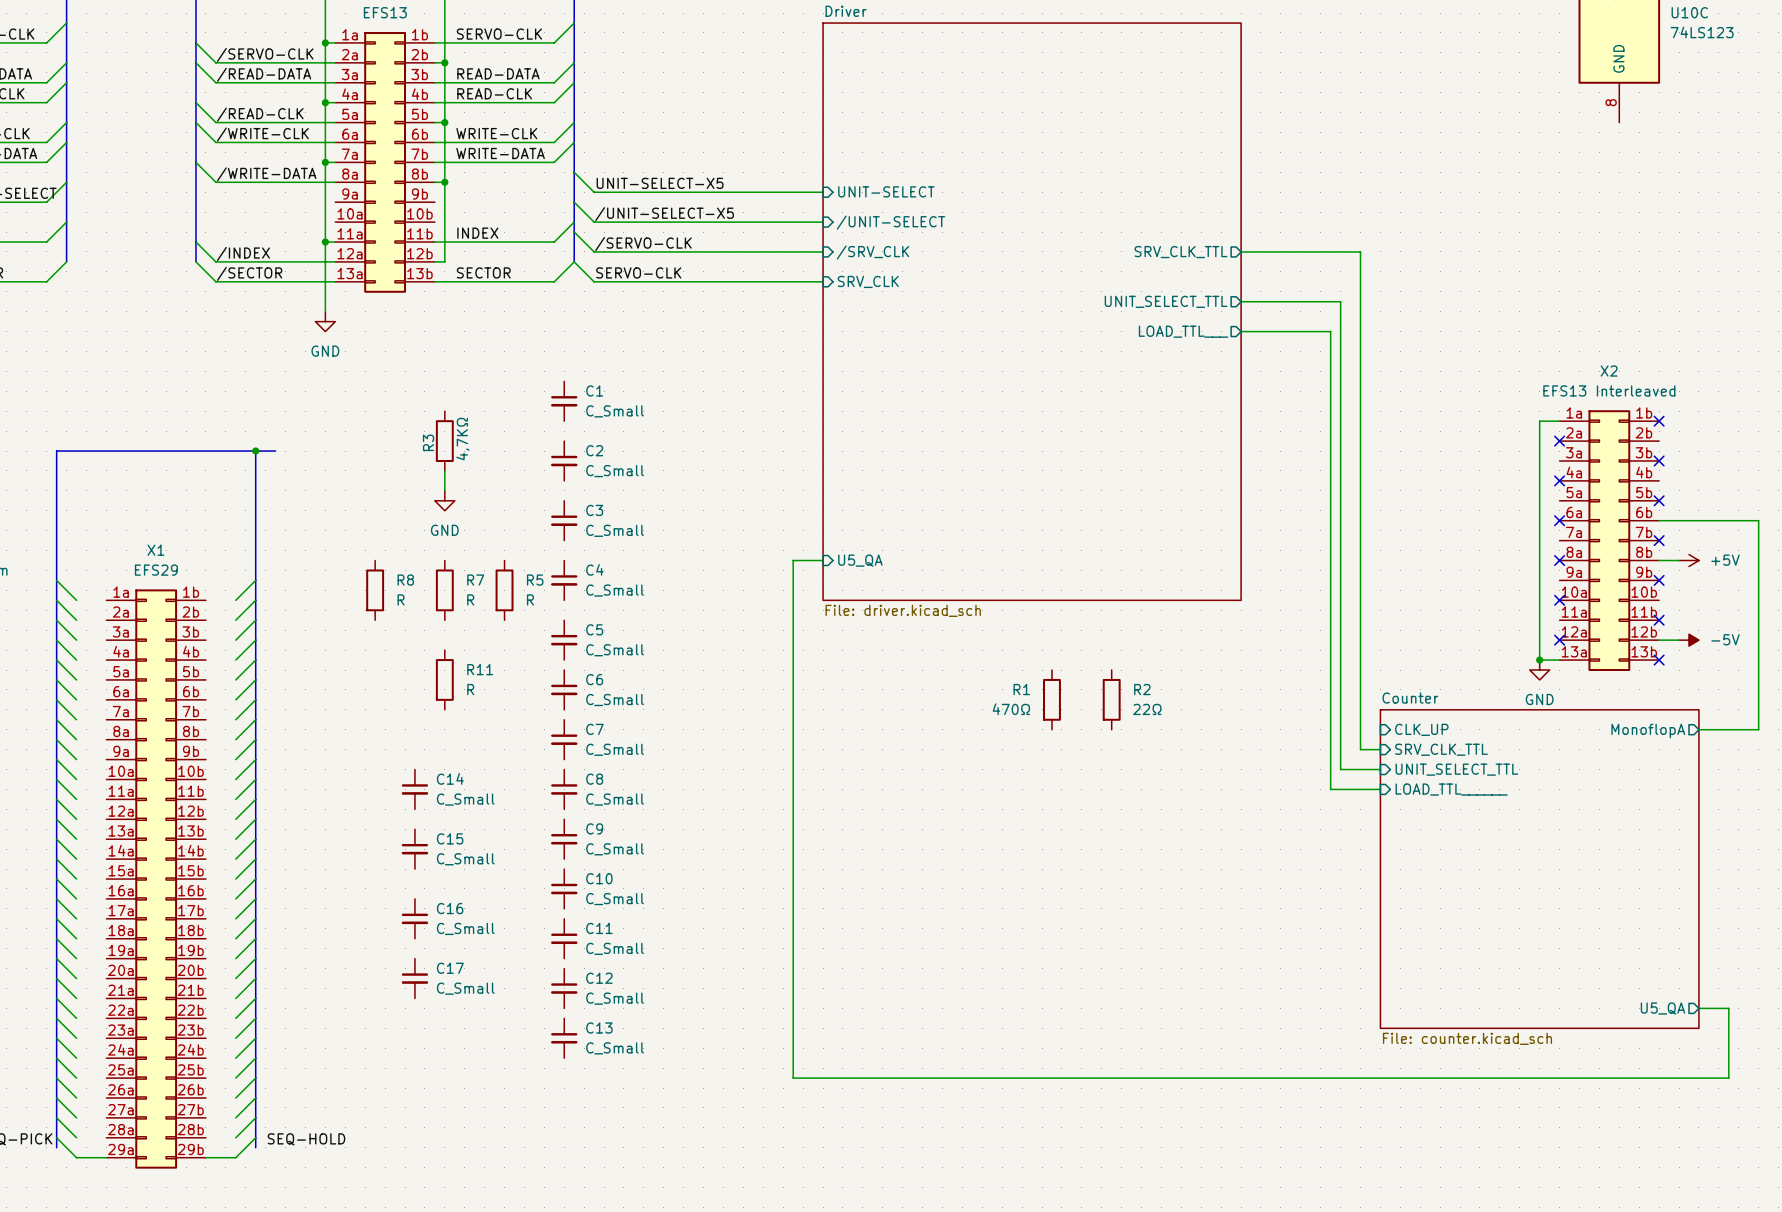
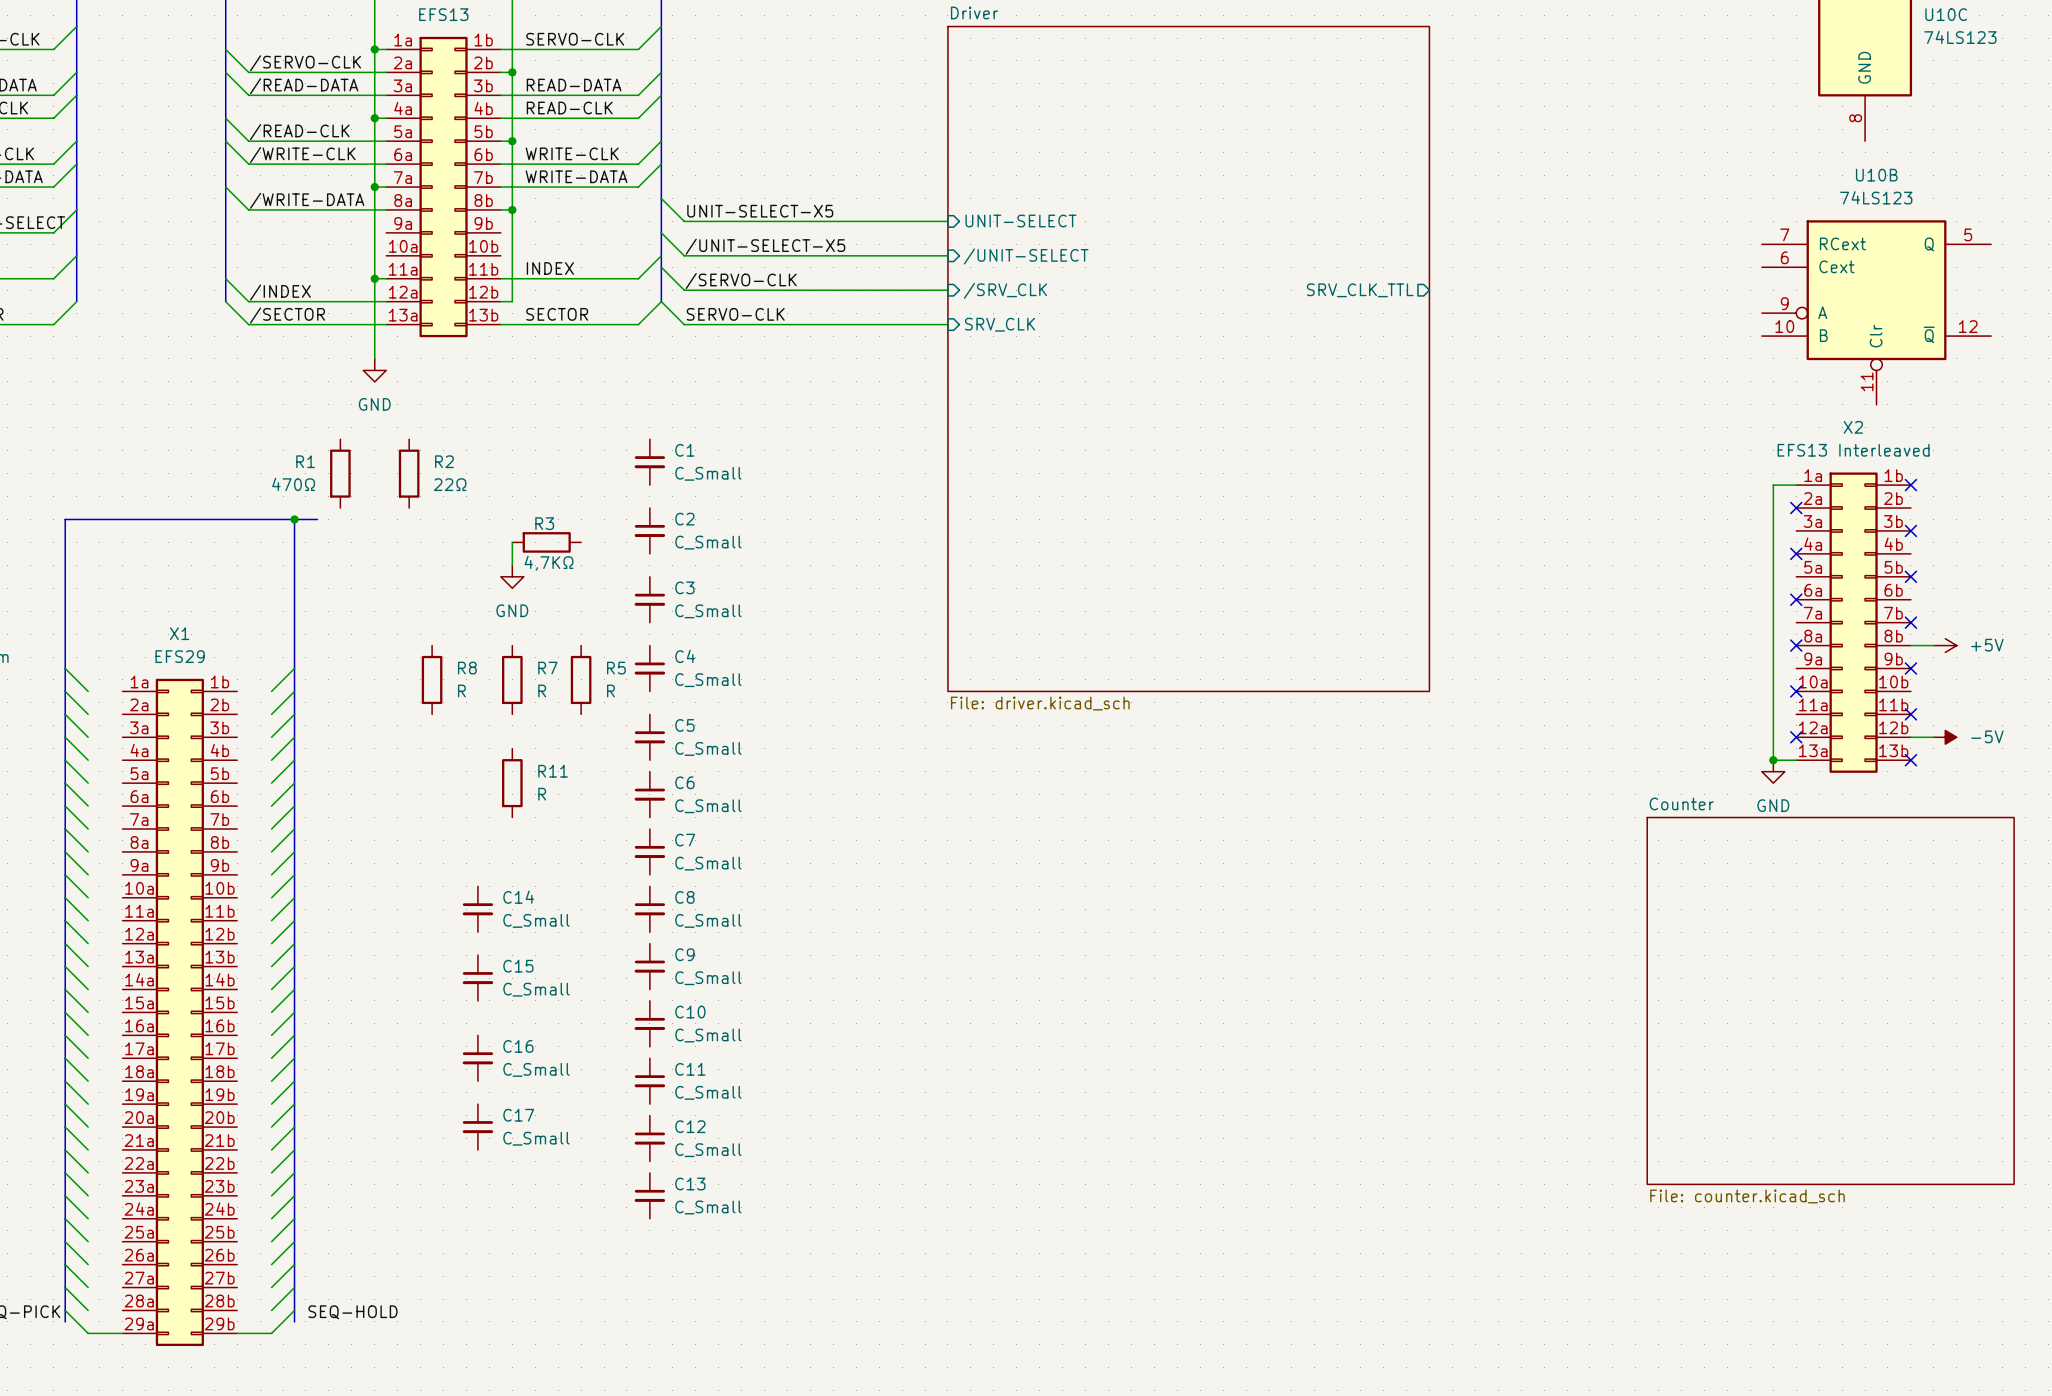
wire: (1241, 251) (1360, 251) (1360, 749) (1380, 749) -> none
U10B: none -> 74LS123 (1876, 312)
sheet pin: UNIT_SELECT_TTL (1166, 301) -> none
wire: (1241, 301) (1340, 301) (1340, 769) (1380, 769) -> none
sheet pin: LOAD_TTL___ (1183, 331) -> none
wire: (1241, 331) (1330, 331) (1330, 789) (1380, 789) -> none
R3 rotation: 0° (444, 441) -> 90° clockwise (546, 542)
R3 position: (444, 441) -> (546, 542)
wire: (1659, 520) (1758, 520) (1758, 729) (1698, 729) -> none
wire: (823, 560) (793, 560) (793, 1078) (1728, 1078) (1728, 1008) (1698, 1008) -> none
sheet pin: U5_QA (860, 560) -> none
R1 position: (1051, 699) -> (340, 473)
R2 position: (1111, 699) -> (409, 473)
sheet pin: CLK_UP (1421, 729) -> none
sheet pin: MonoflopA (1648, 731) -> none
sheet pin: SRV_CLK_TTL (1441, 749) -> none
sheet pin: UNIT_SELECT_TTL (1456, 769) -> none
sheet pin: LOAD_TTL______ (1451, 789) -> none
sheet Counter position: (1539, 869) -> (1830, 1000)
sheet pin: U5_QA (1662, 1008) -> none

